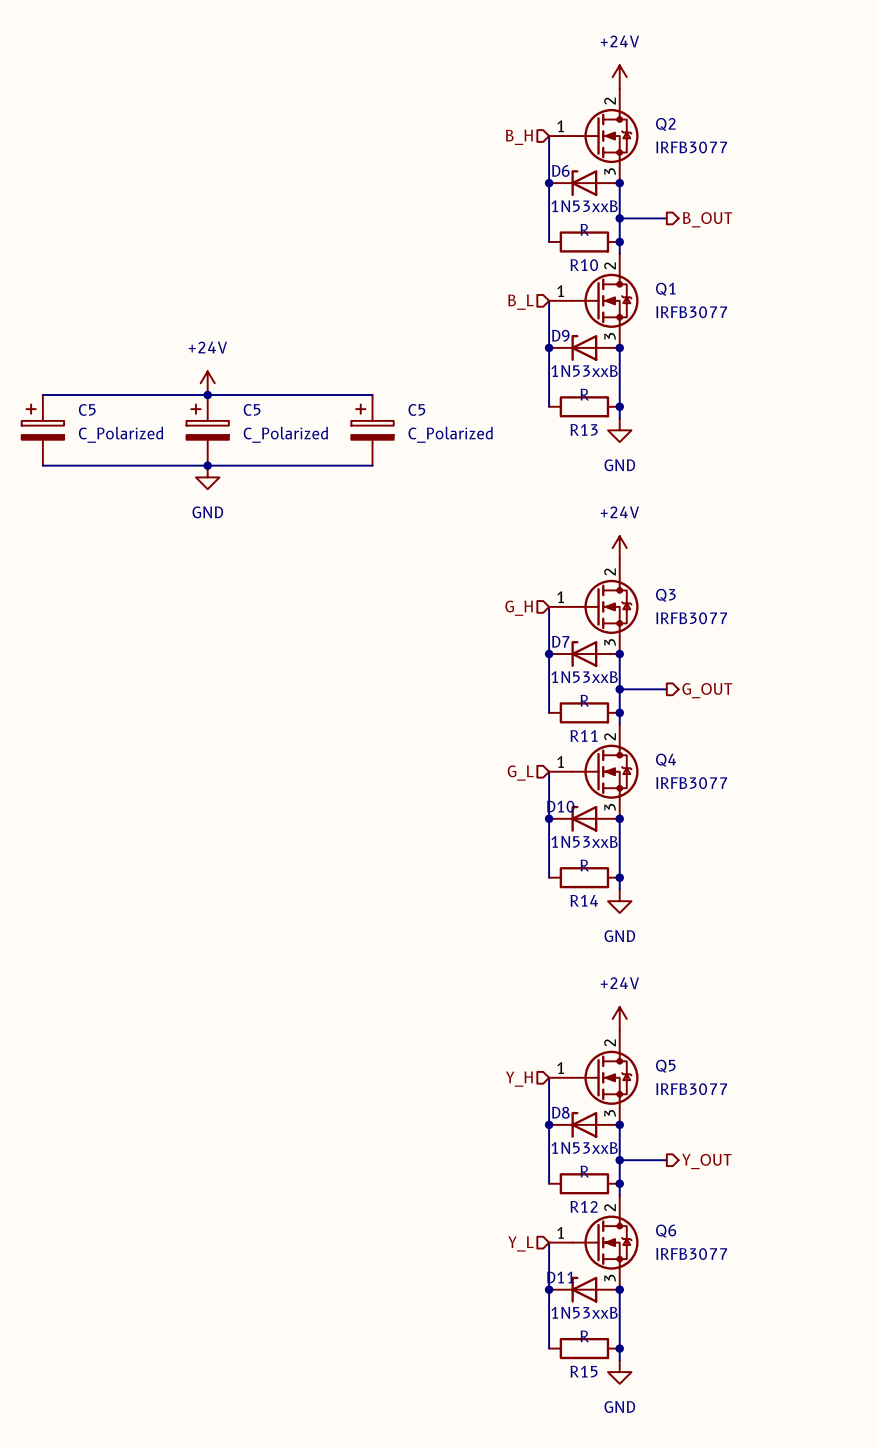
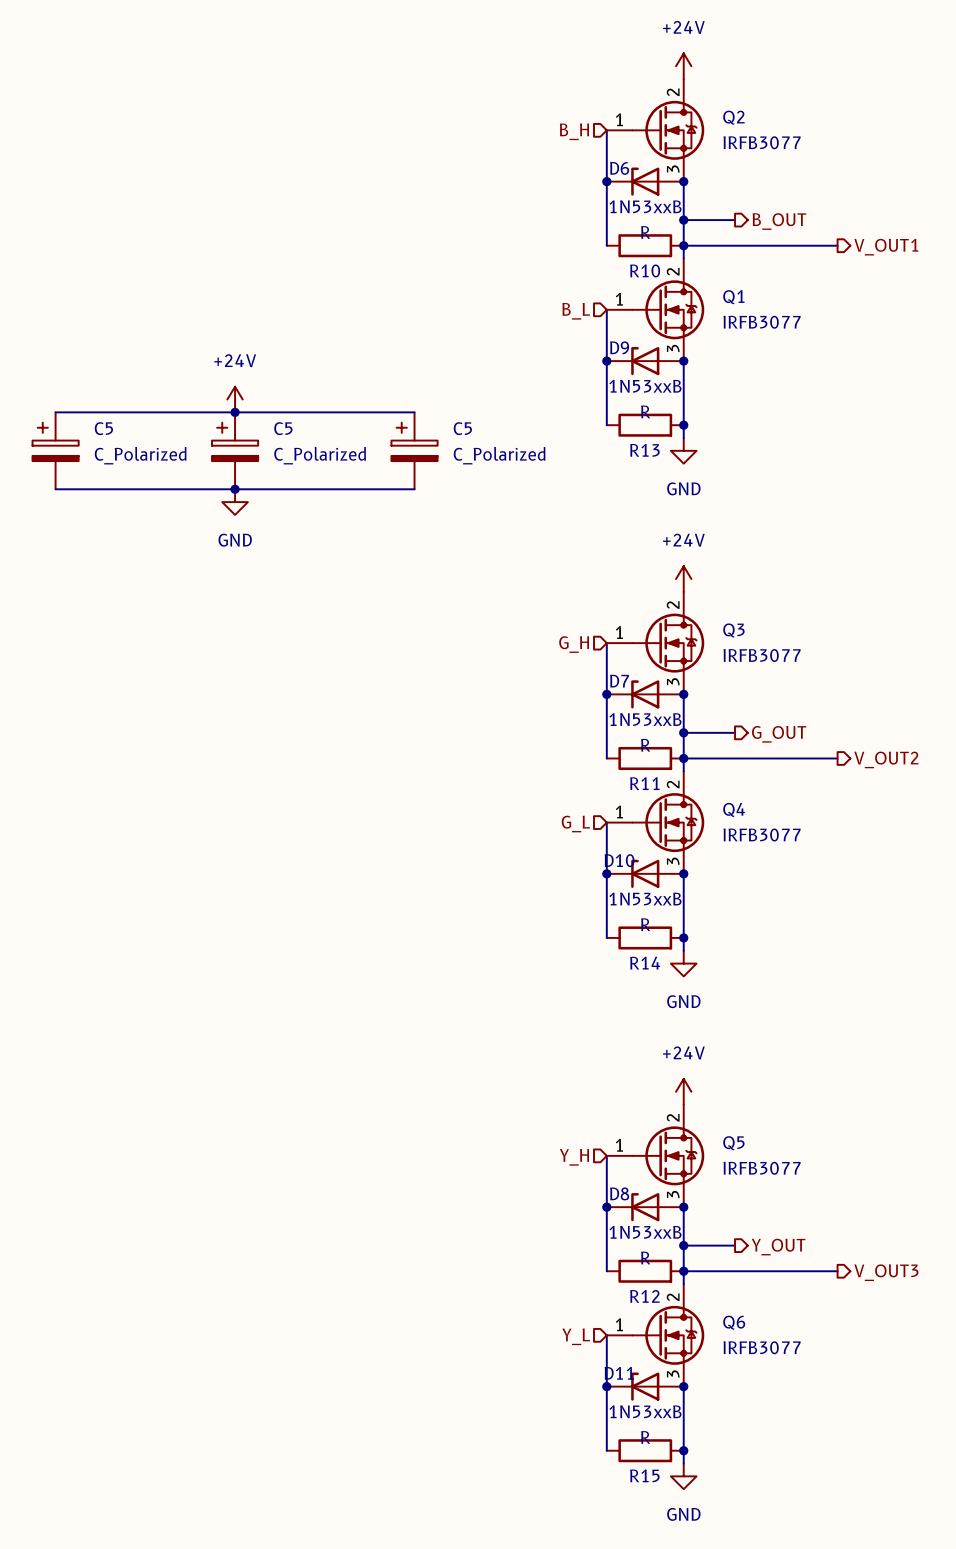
wire: none -> (683, 245) (837, 245)
hierarchical label: none -> V_OUT1 (886, 247)
wire: none -> (683, 758) (837, 758)
hierarchical label: none -> V_OUT2 (886, 759)
wire: none -> (683, 1271) (837, 1271)
hierarchical label: none -> V_OUT3 (886, 1272)

